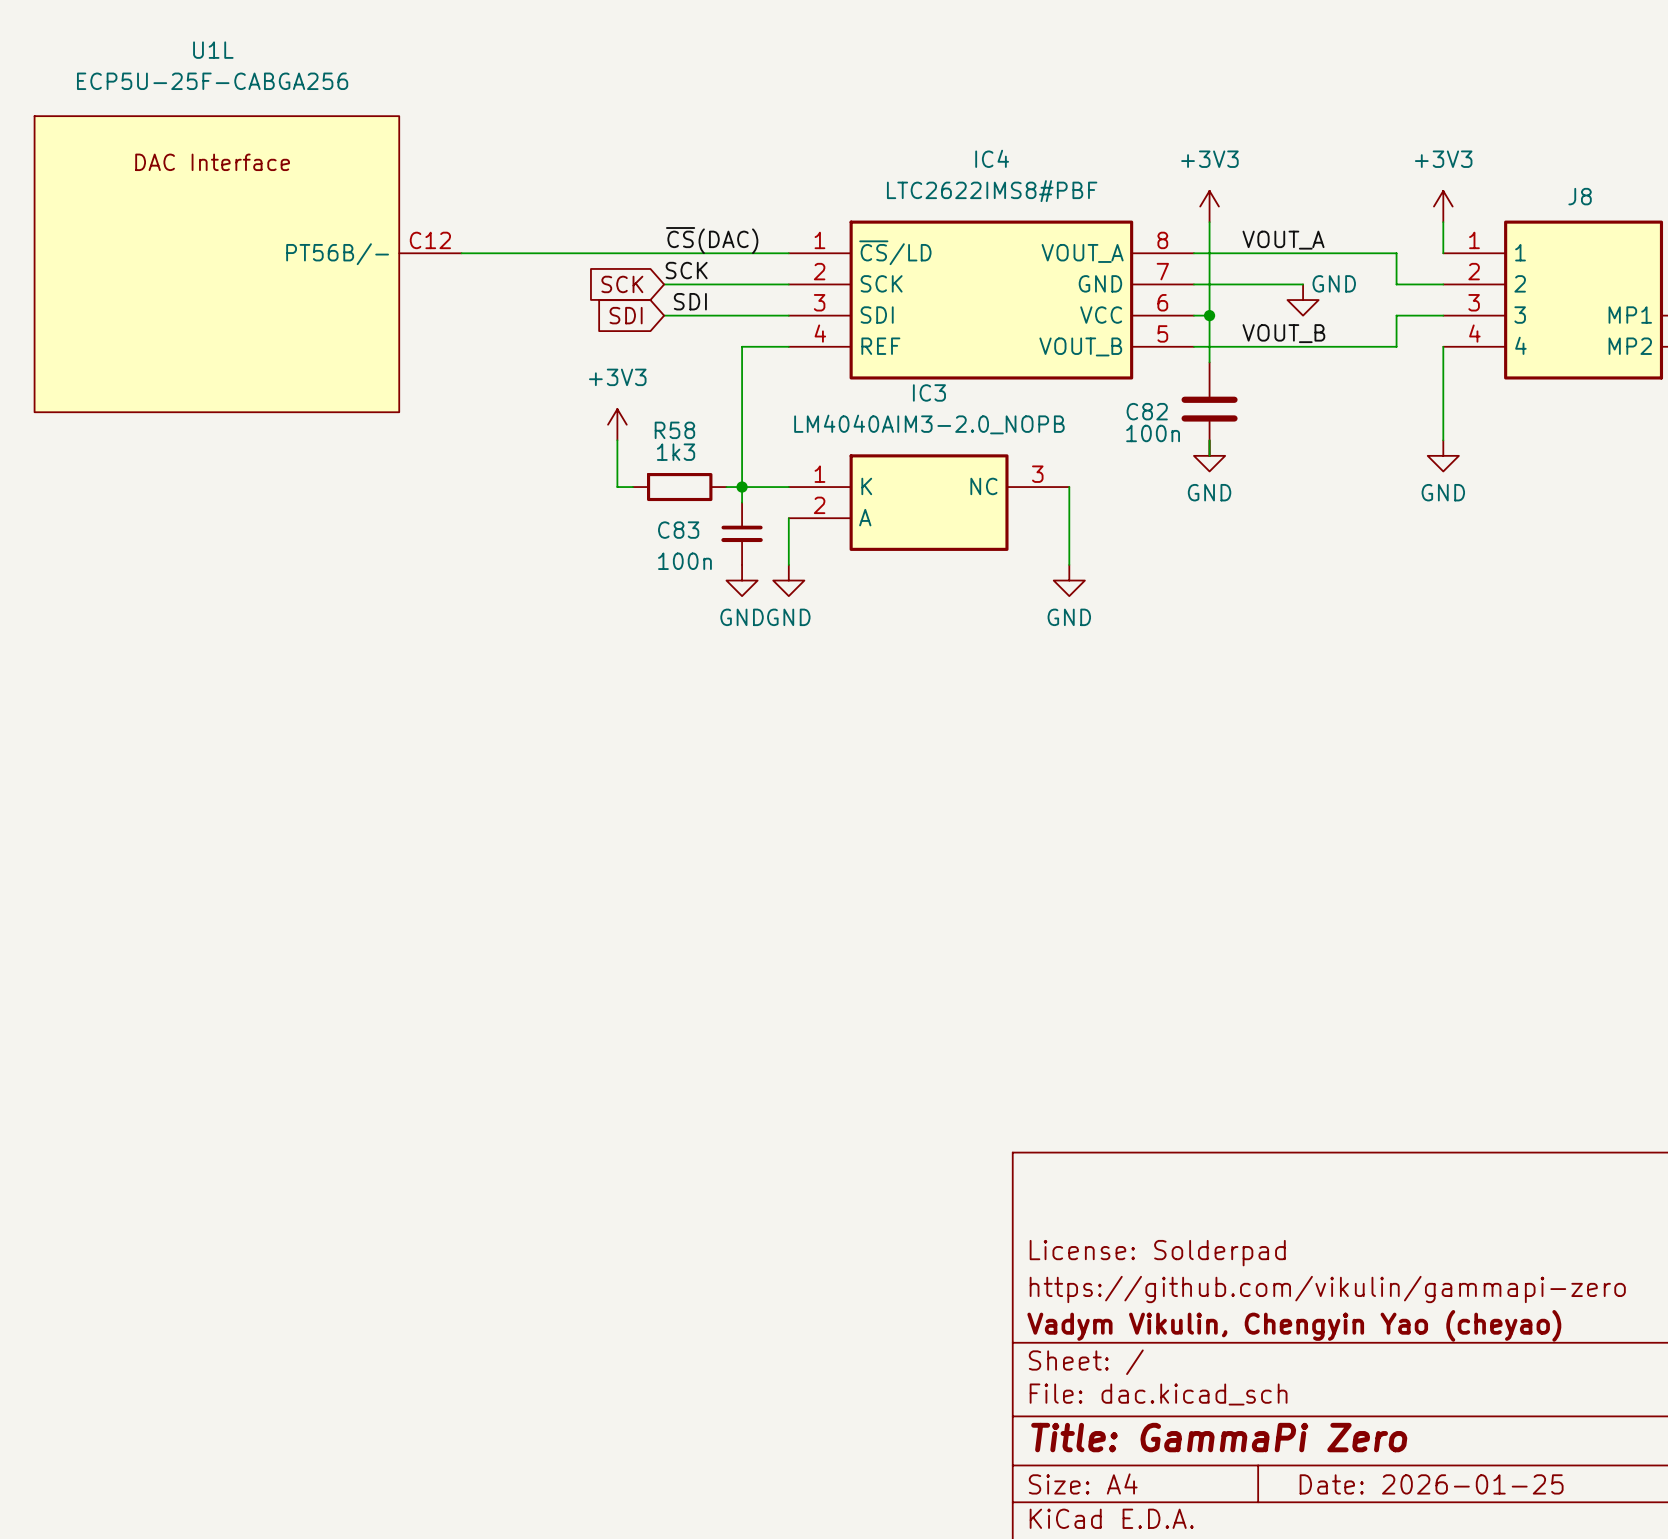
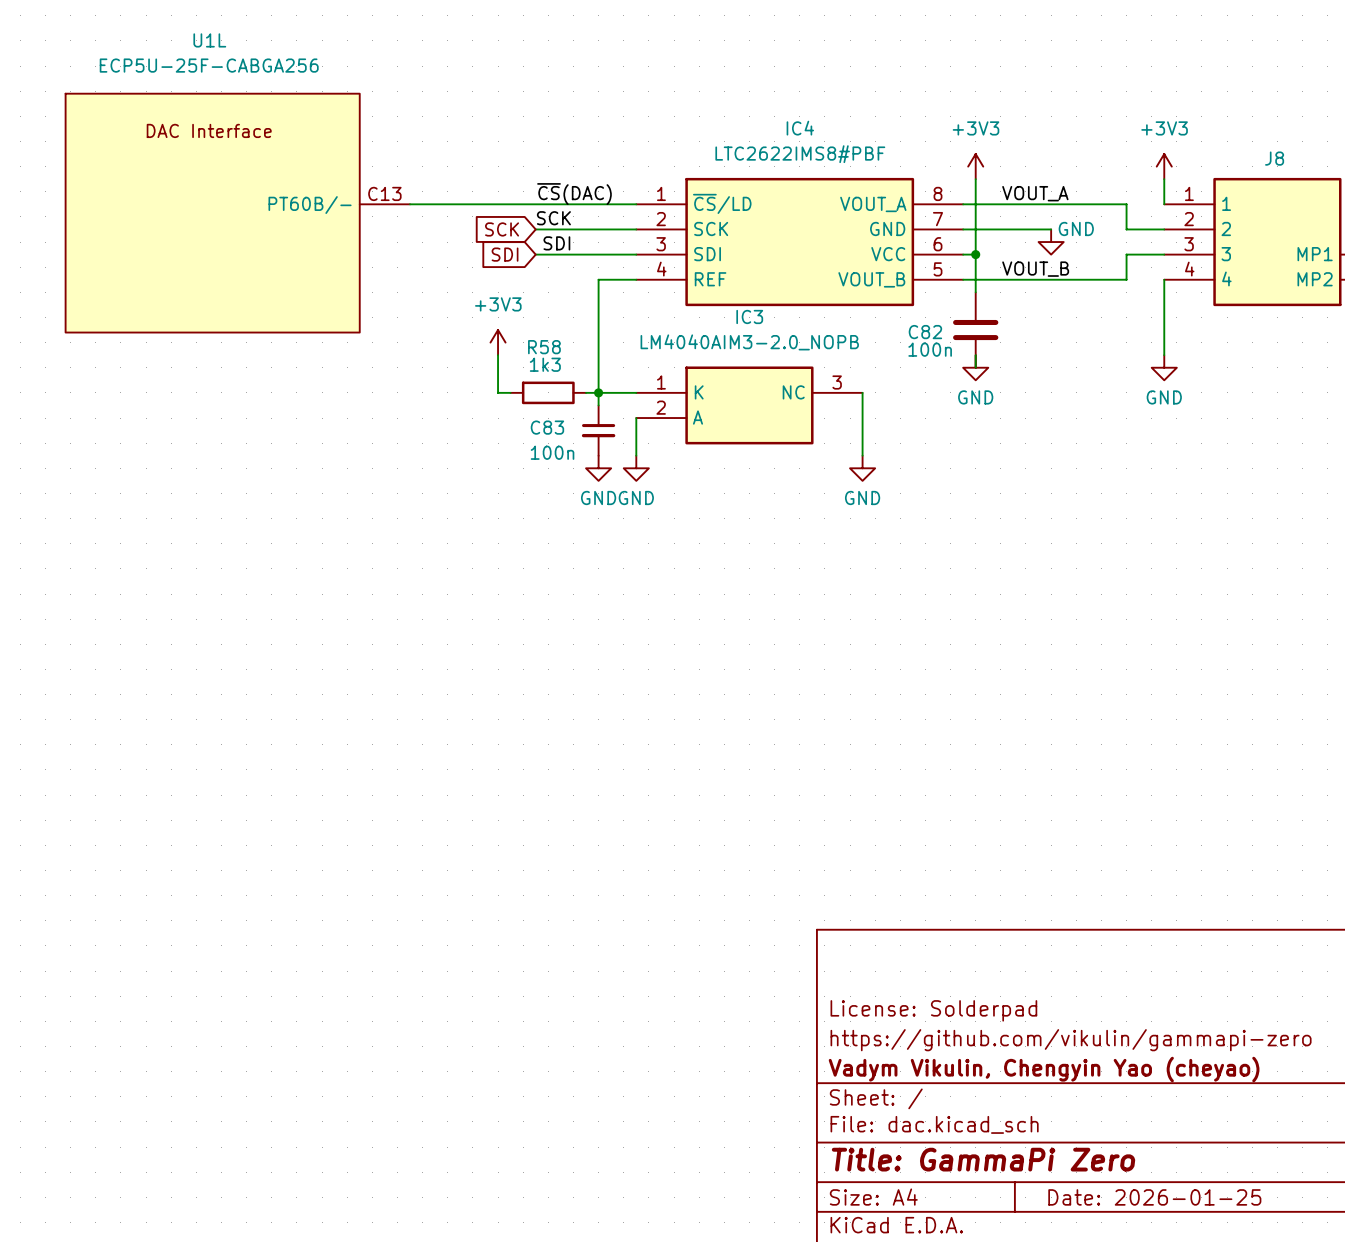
U1L pin number: C12 (430, 240) -> C13 (384, 193)
U1L pin name: PT56B/- (337, 254) -> PT60B/- (310, 205)
U1L position: (276, 373) -> (260, 301)

